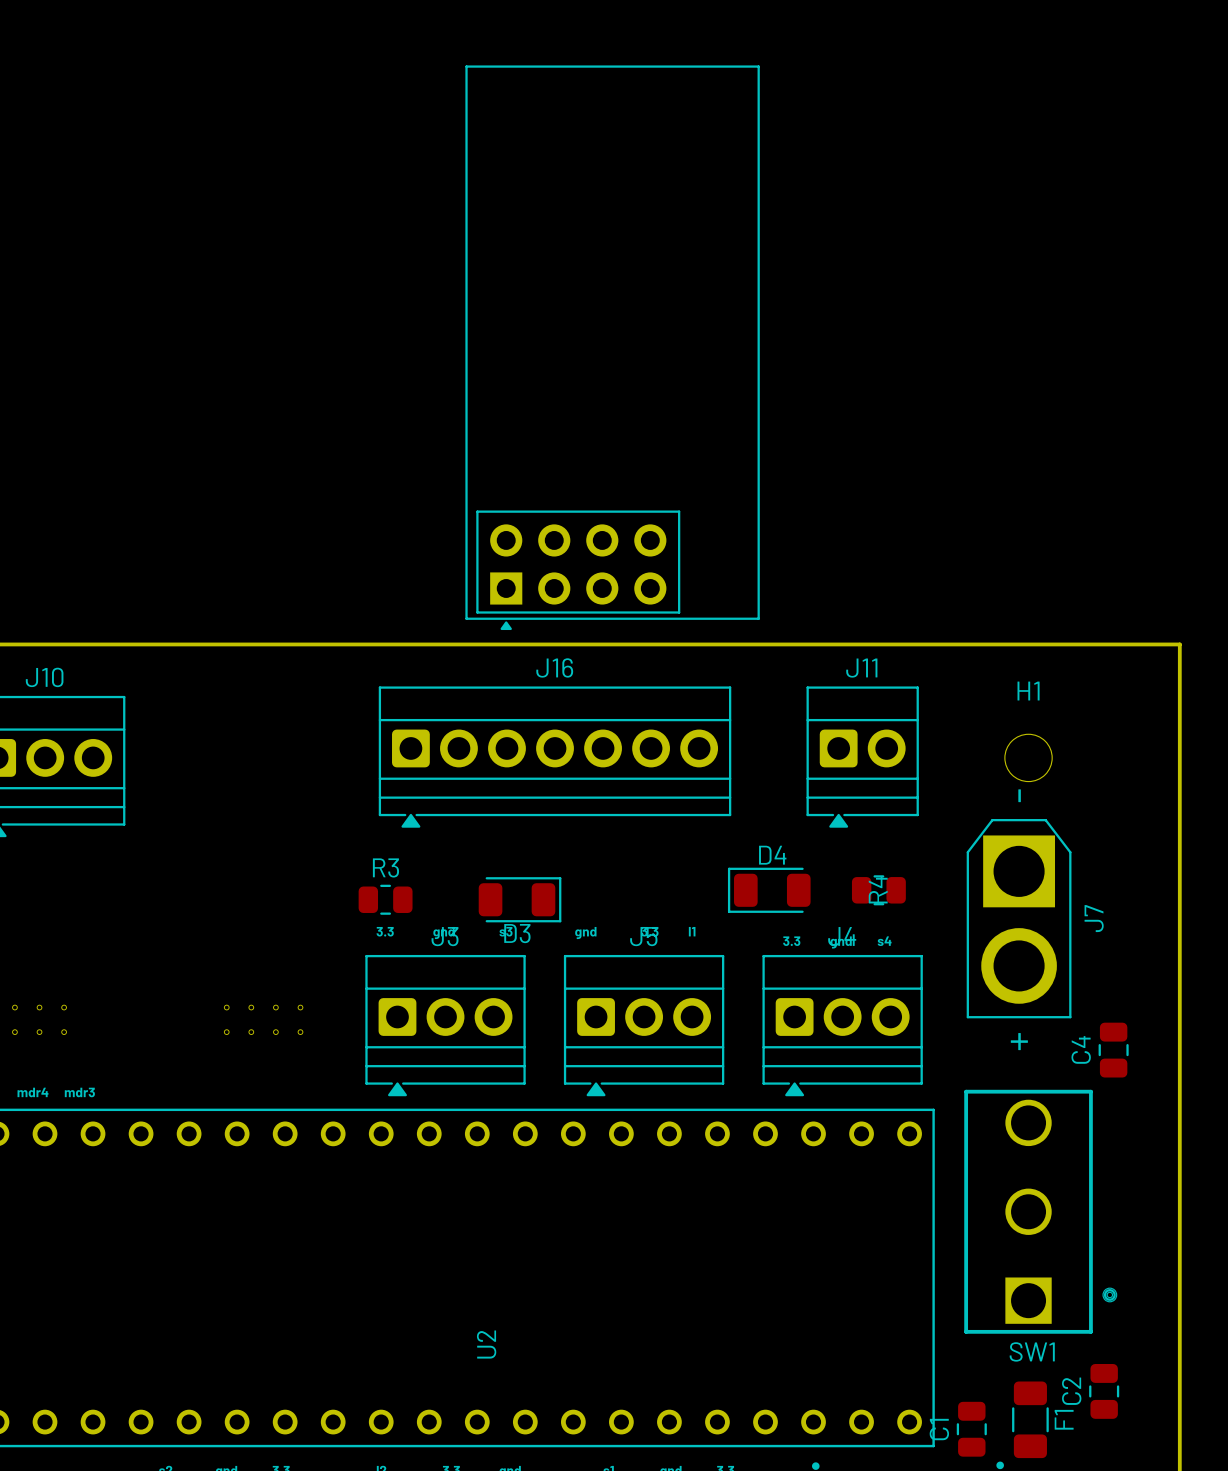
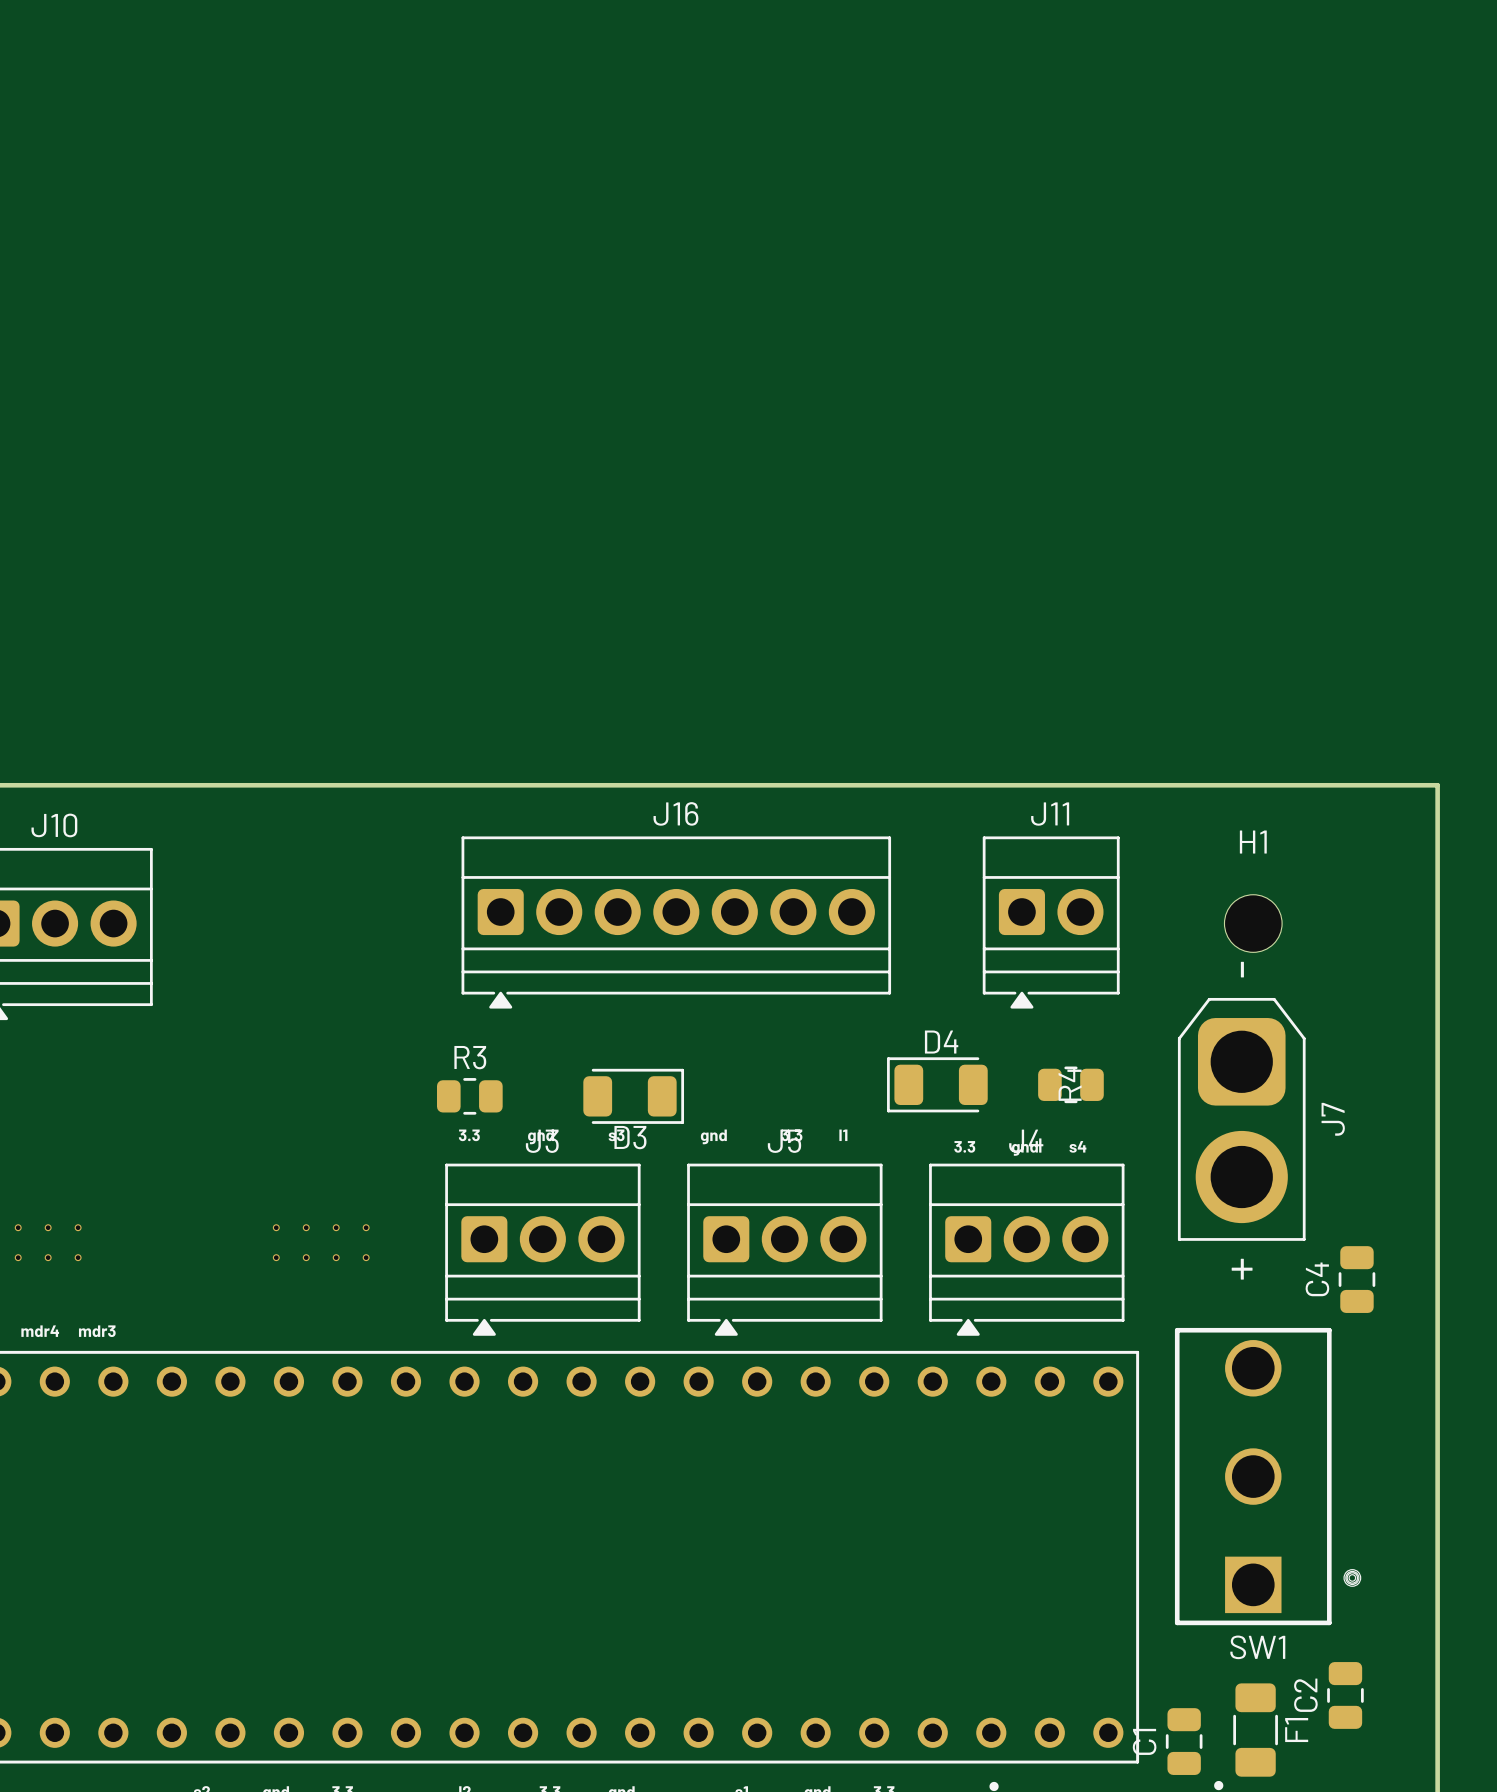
U2: (612, 347) -> none
J7 footprint: [966, 819, 1072, 1019] -> [1177, 997, 1306, 1241]

